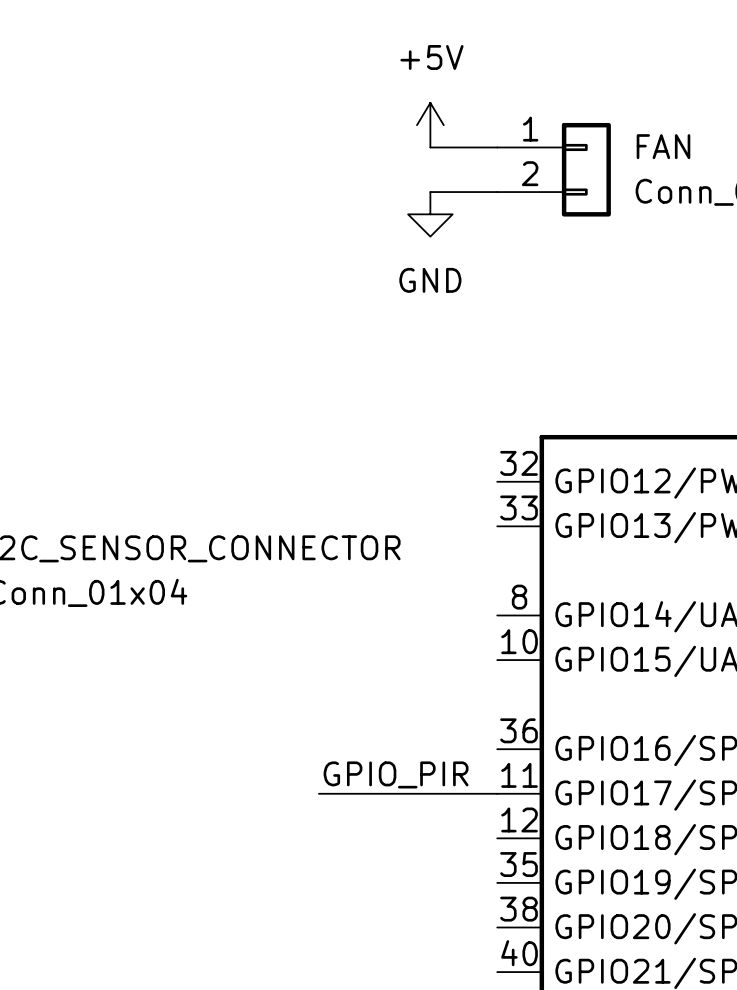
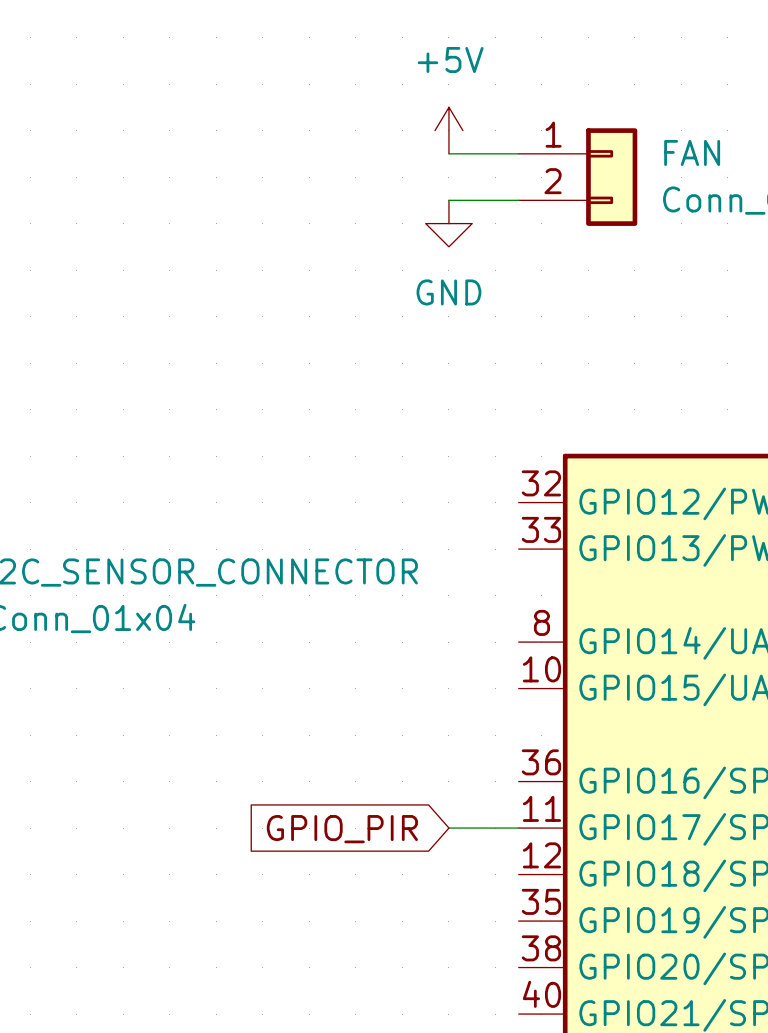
label: GPIO_PIR (396, 774) -> none
wire: (318, 793) (430, 793) -> none
global label: none -> GPIO_PIR (342, 829)

